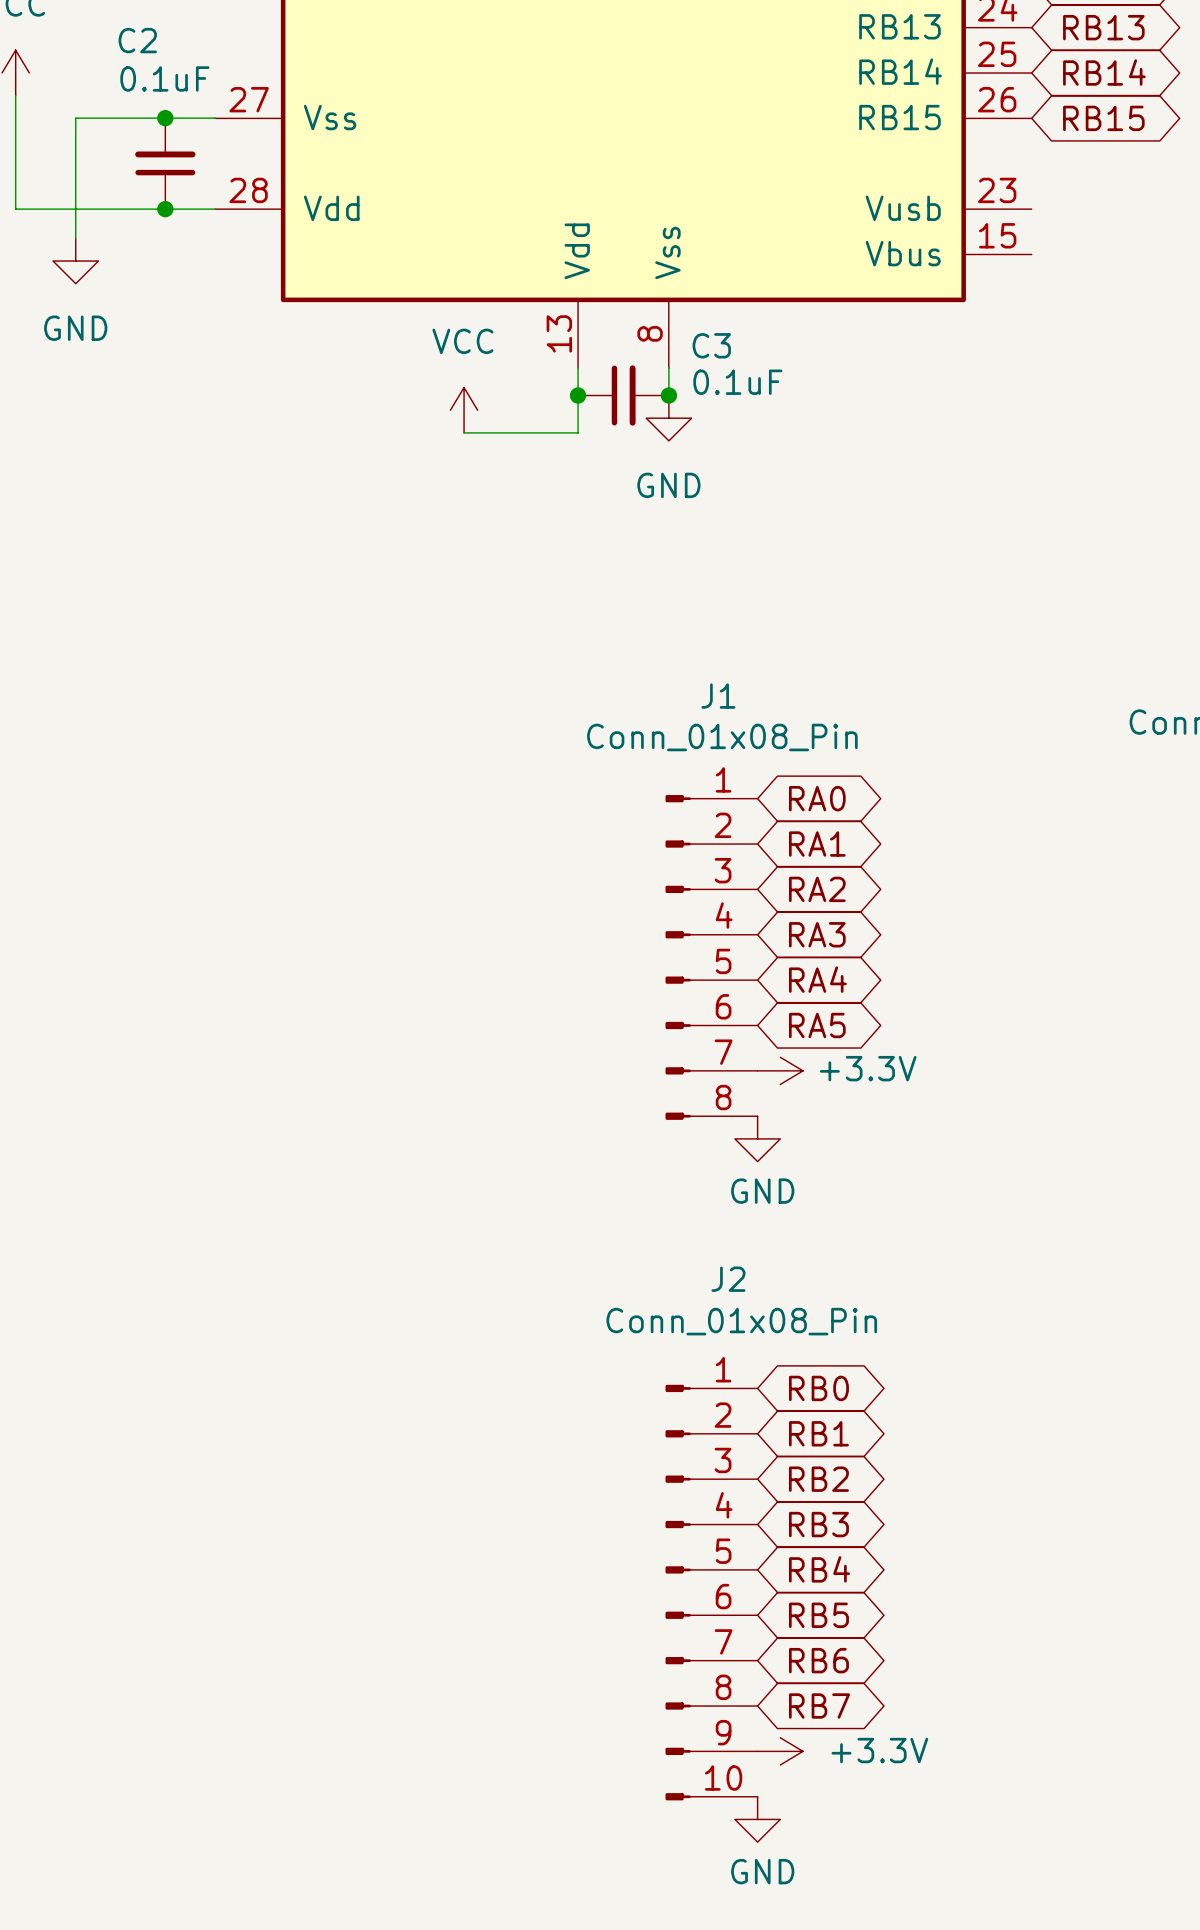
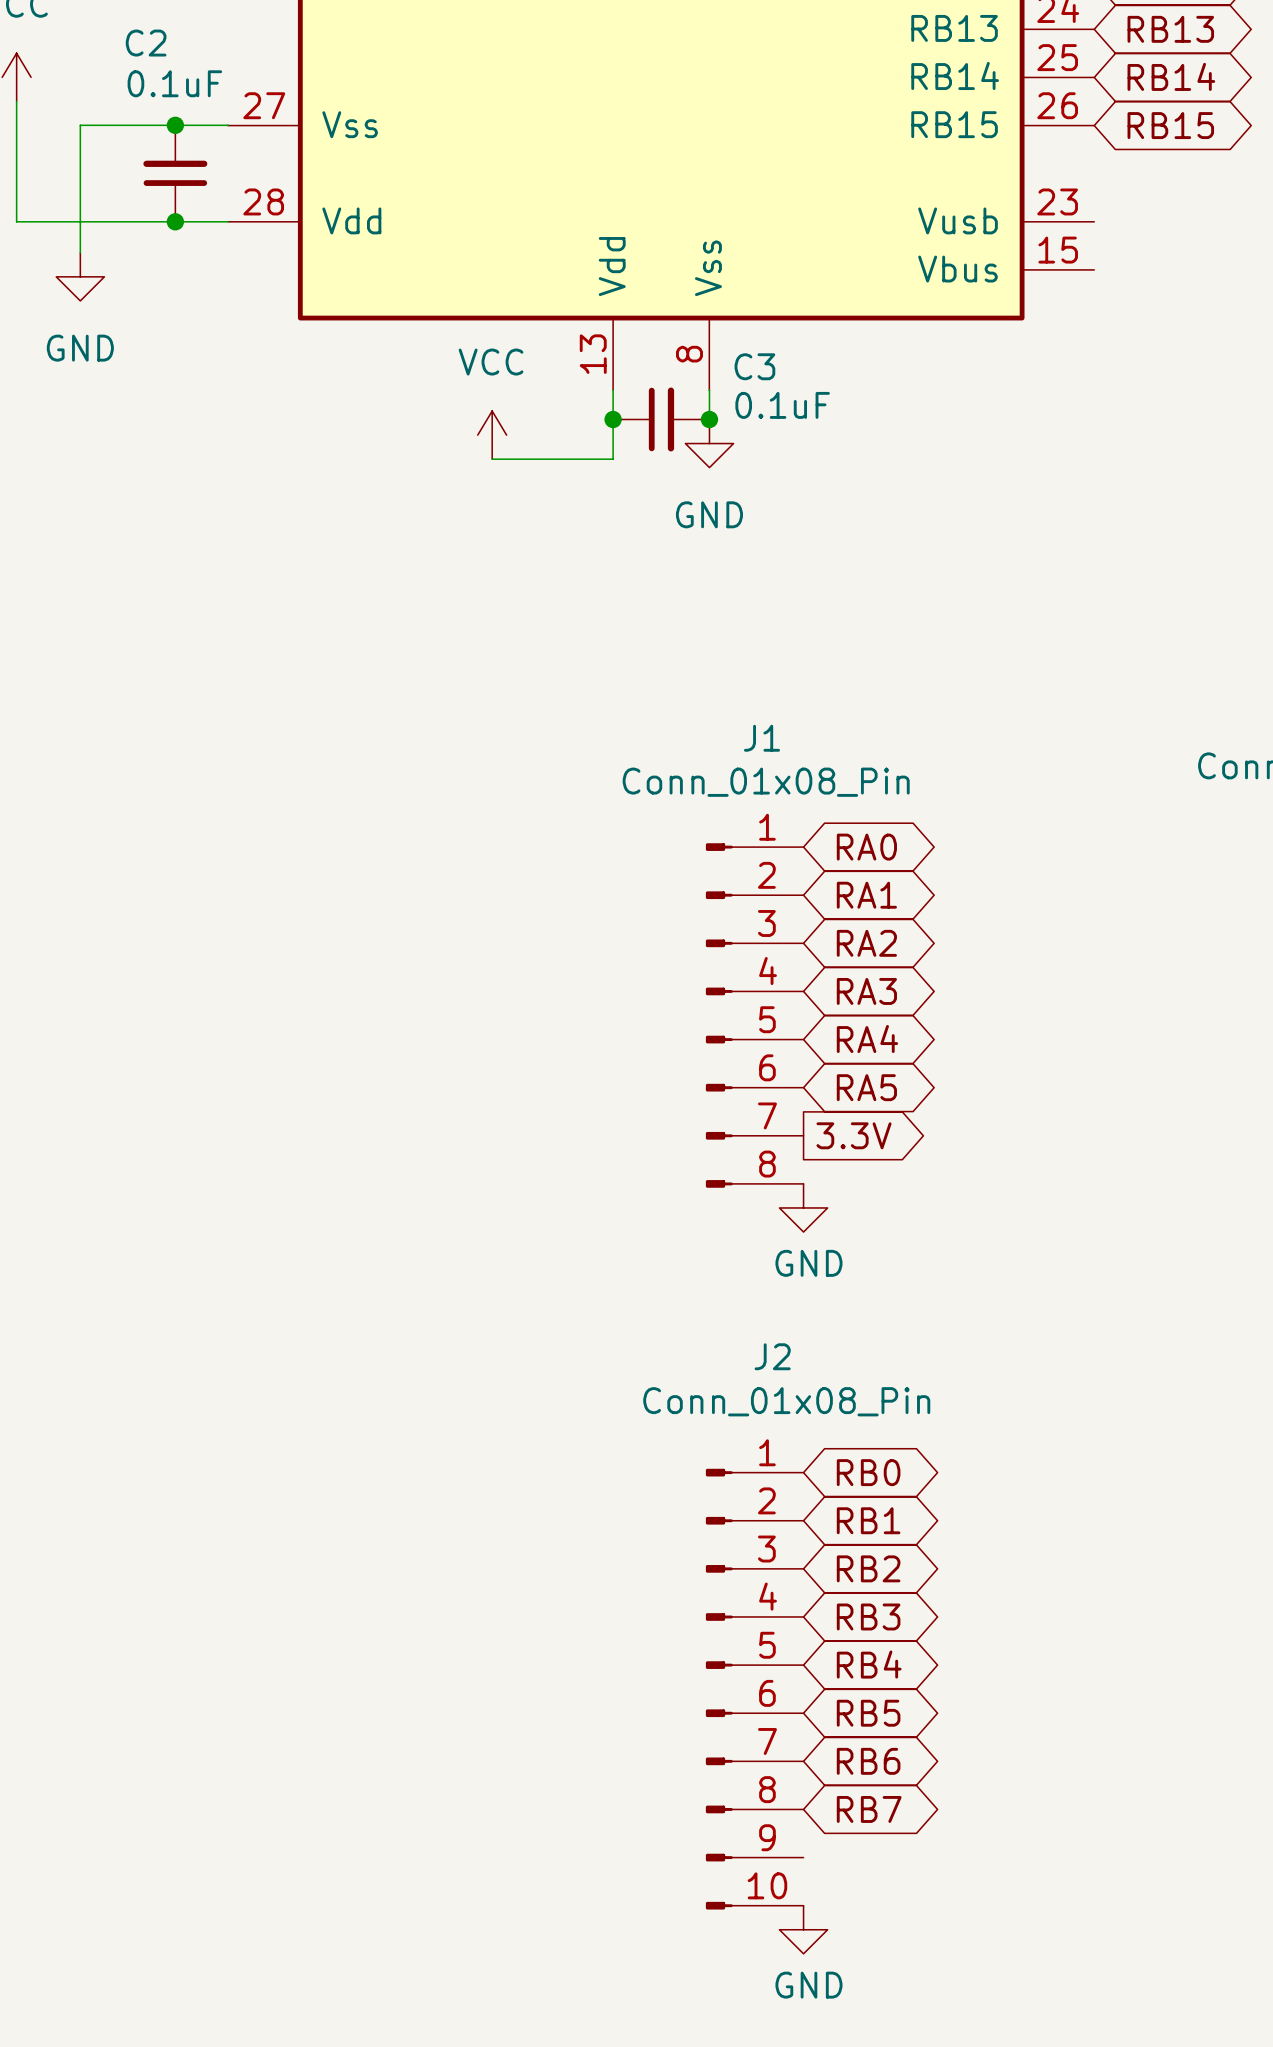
power symbol: +3.3V (780, 1070) -> none
global label: none -> 3.3V (853, 1135)
power symbol: +3.3V (780, 1751) -> none

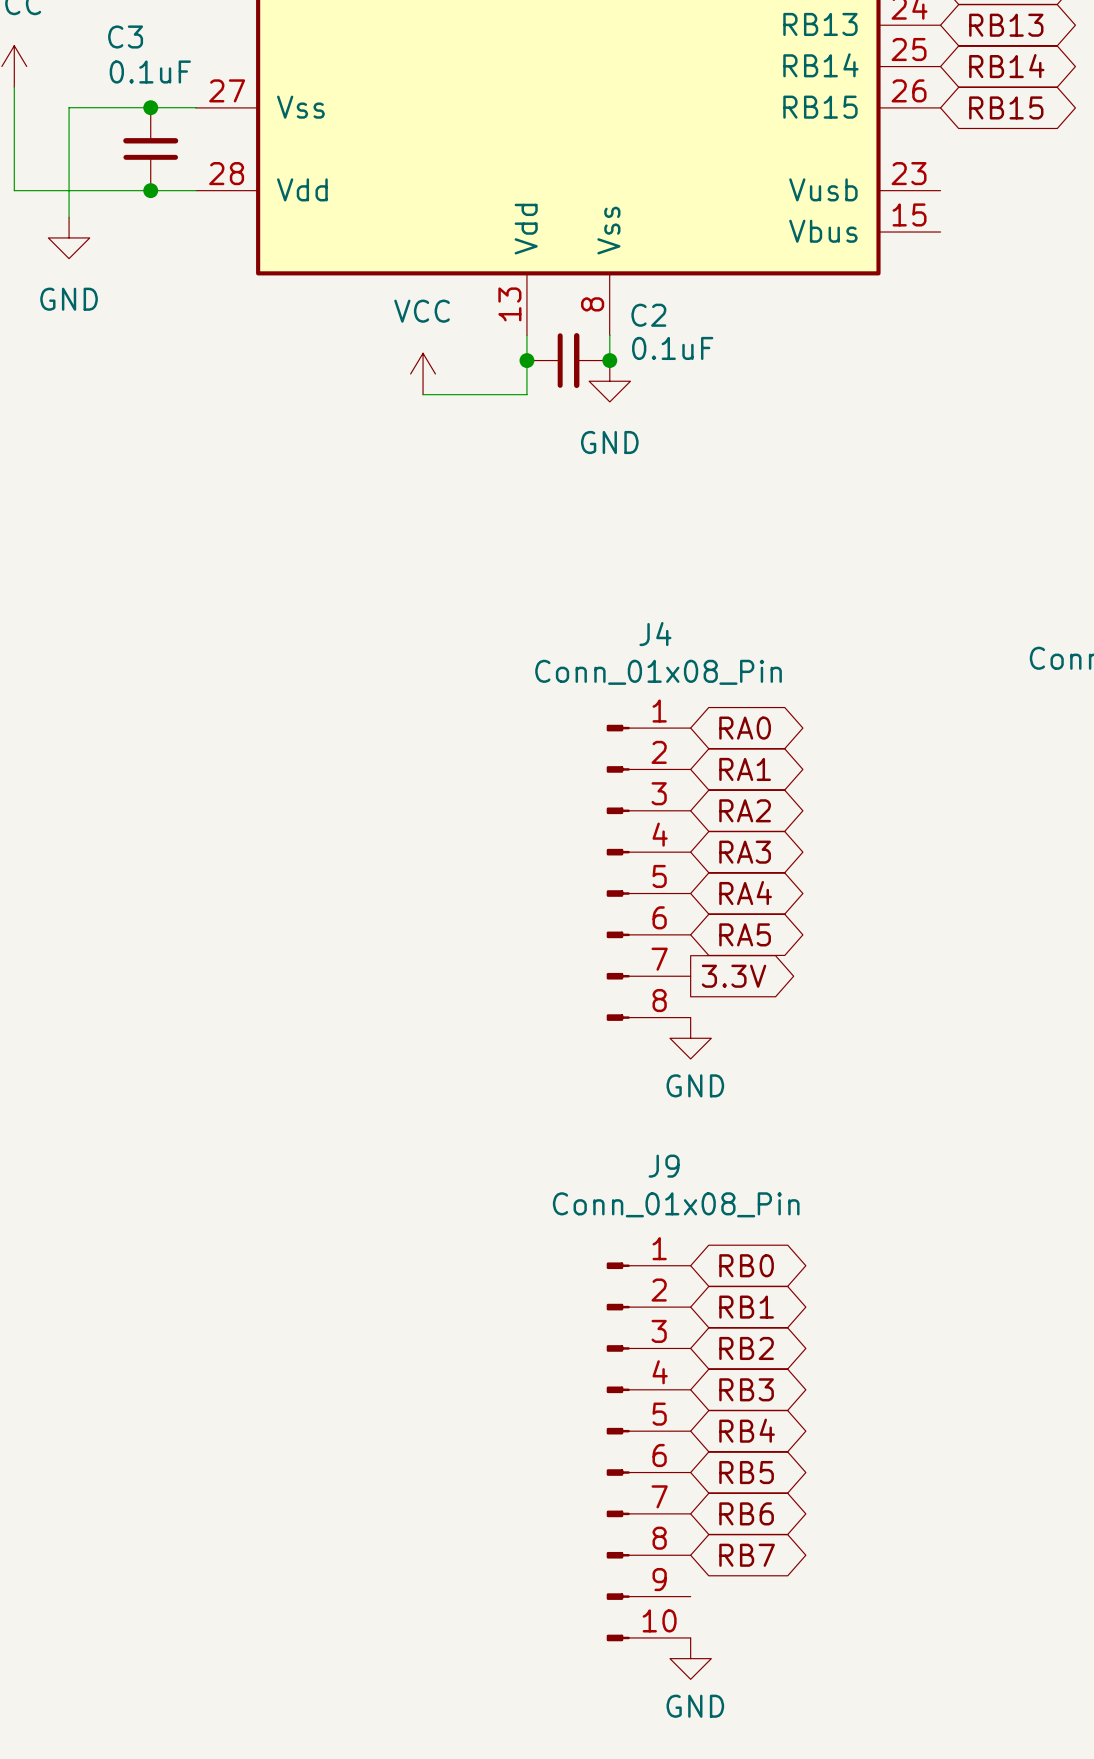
C2 name: C2 (146, 43) -> C3 (125, 36)
C3 name: C3 (754, 366) -> C2 (648, 315)
J1 name: J1 (762, 738) -> J4 (655, 634)
J2 name: J2 (772, 1356) -> J9 (664, 1166)

